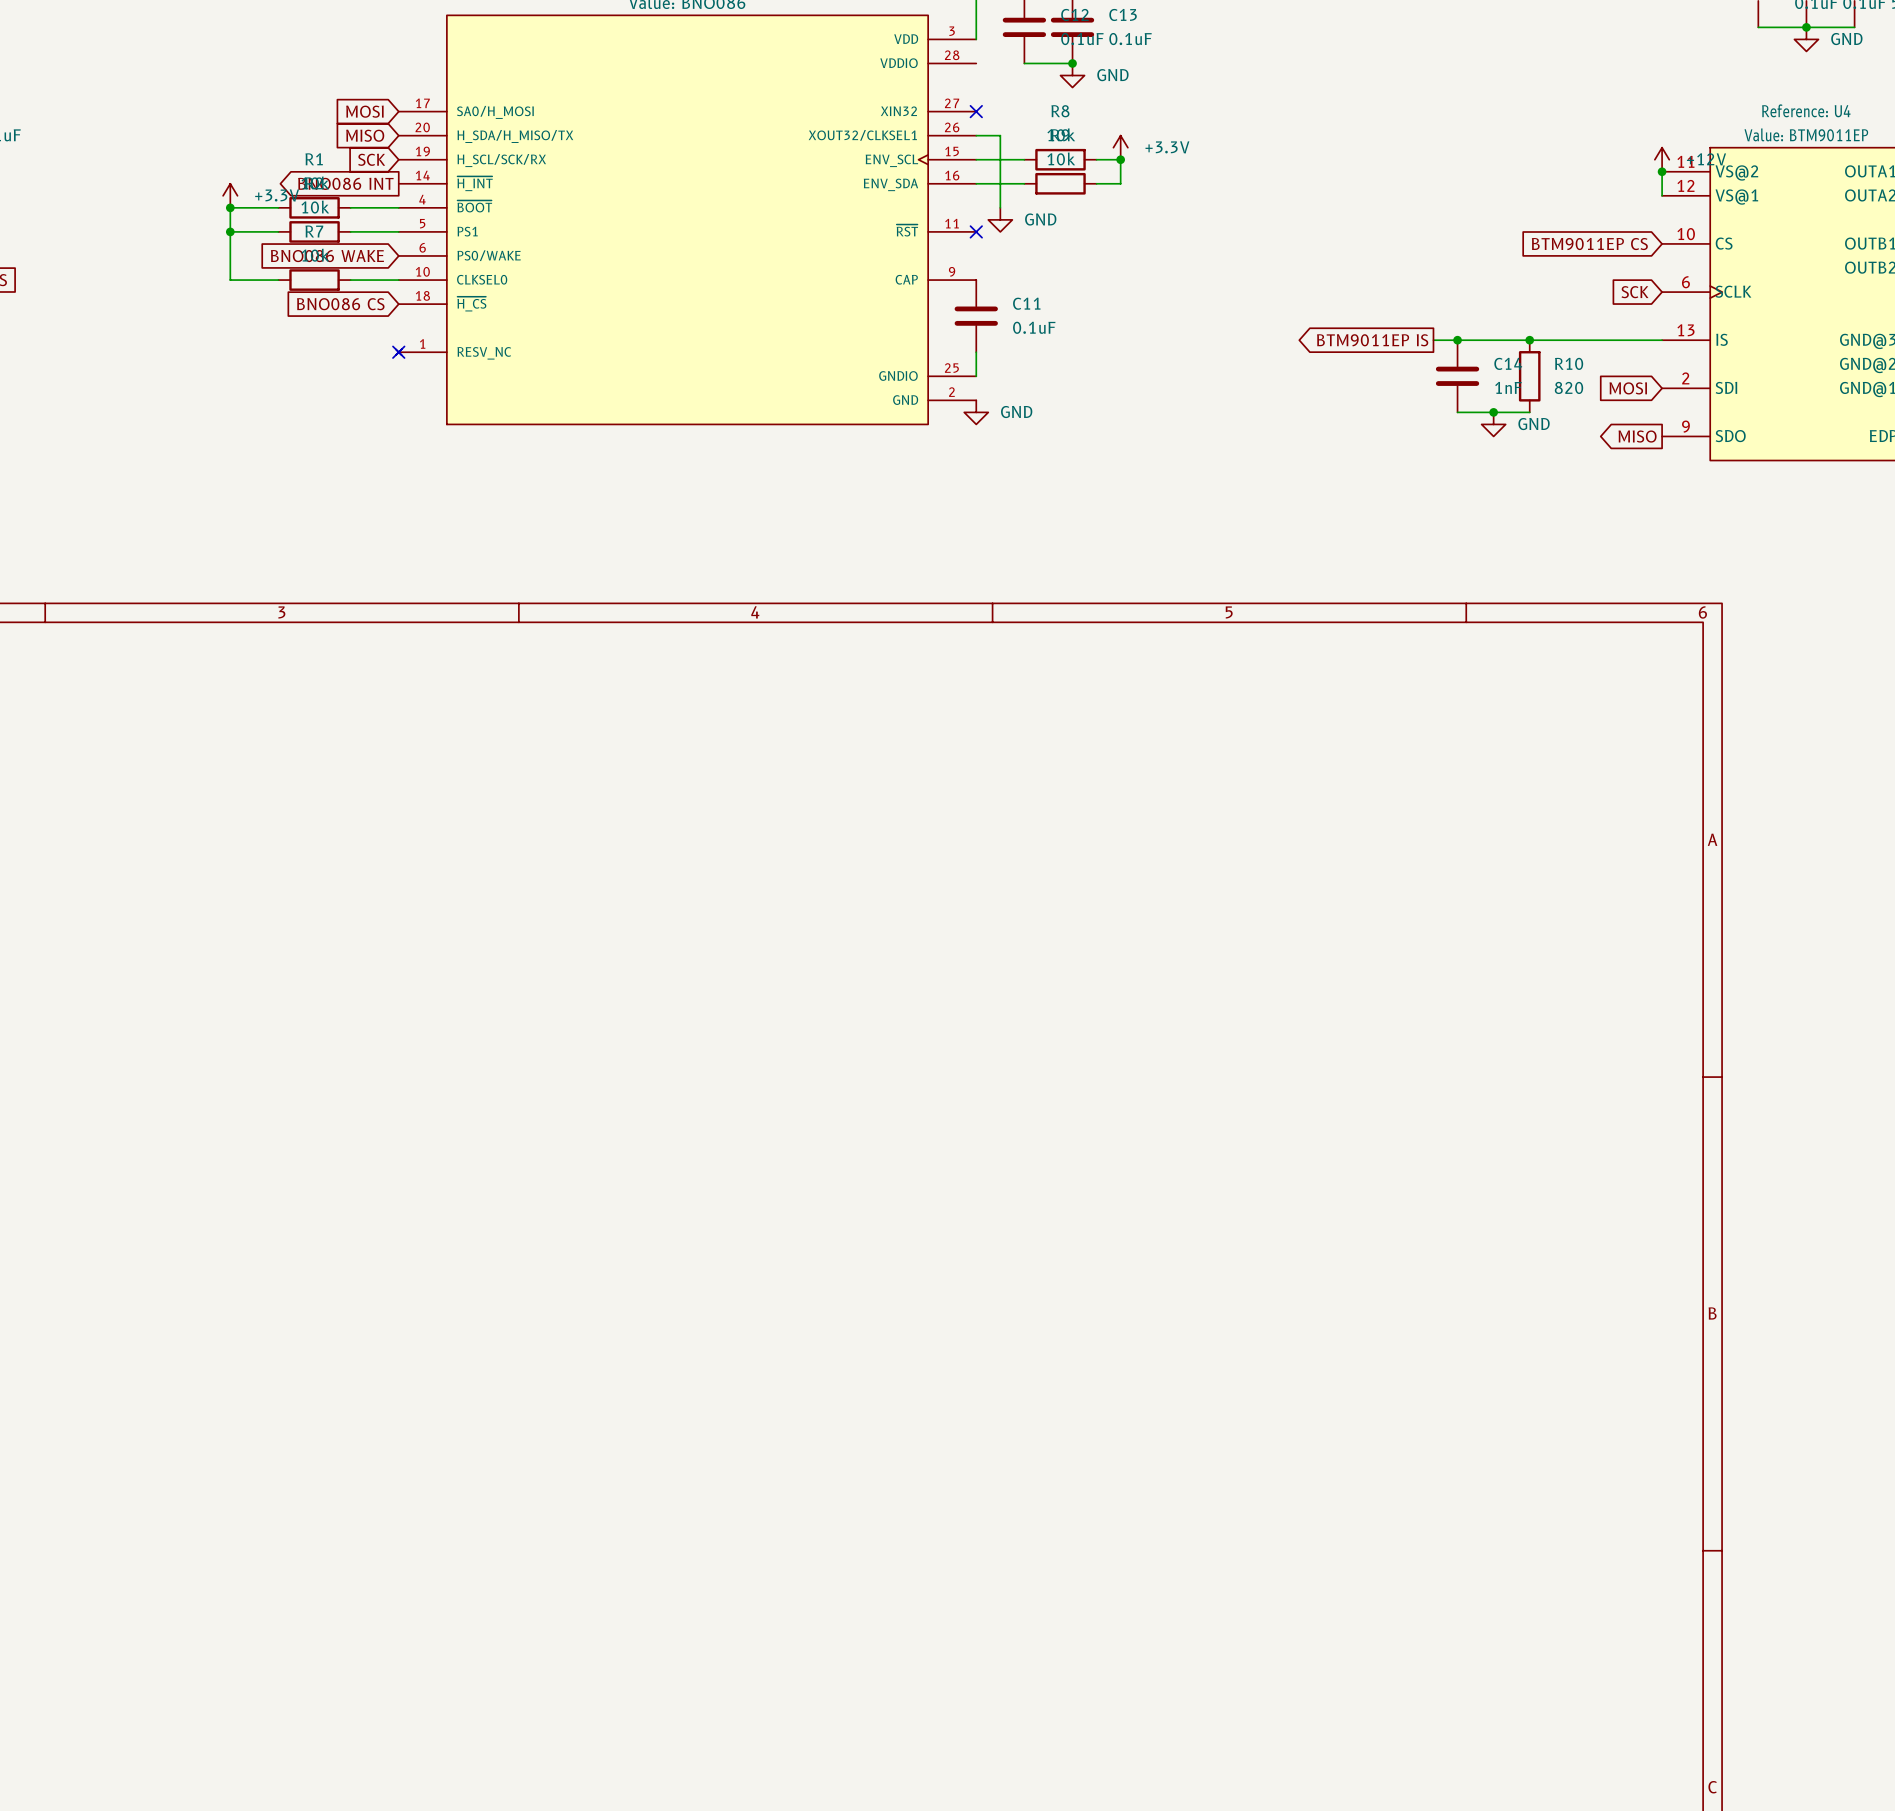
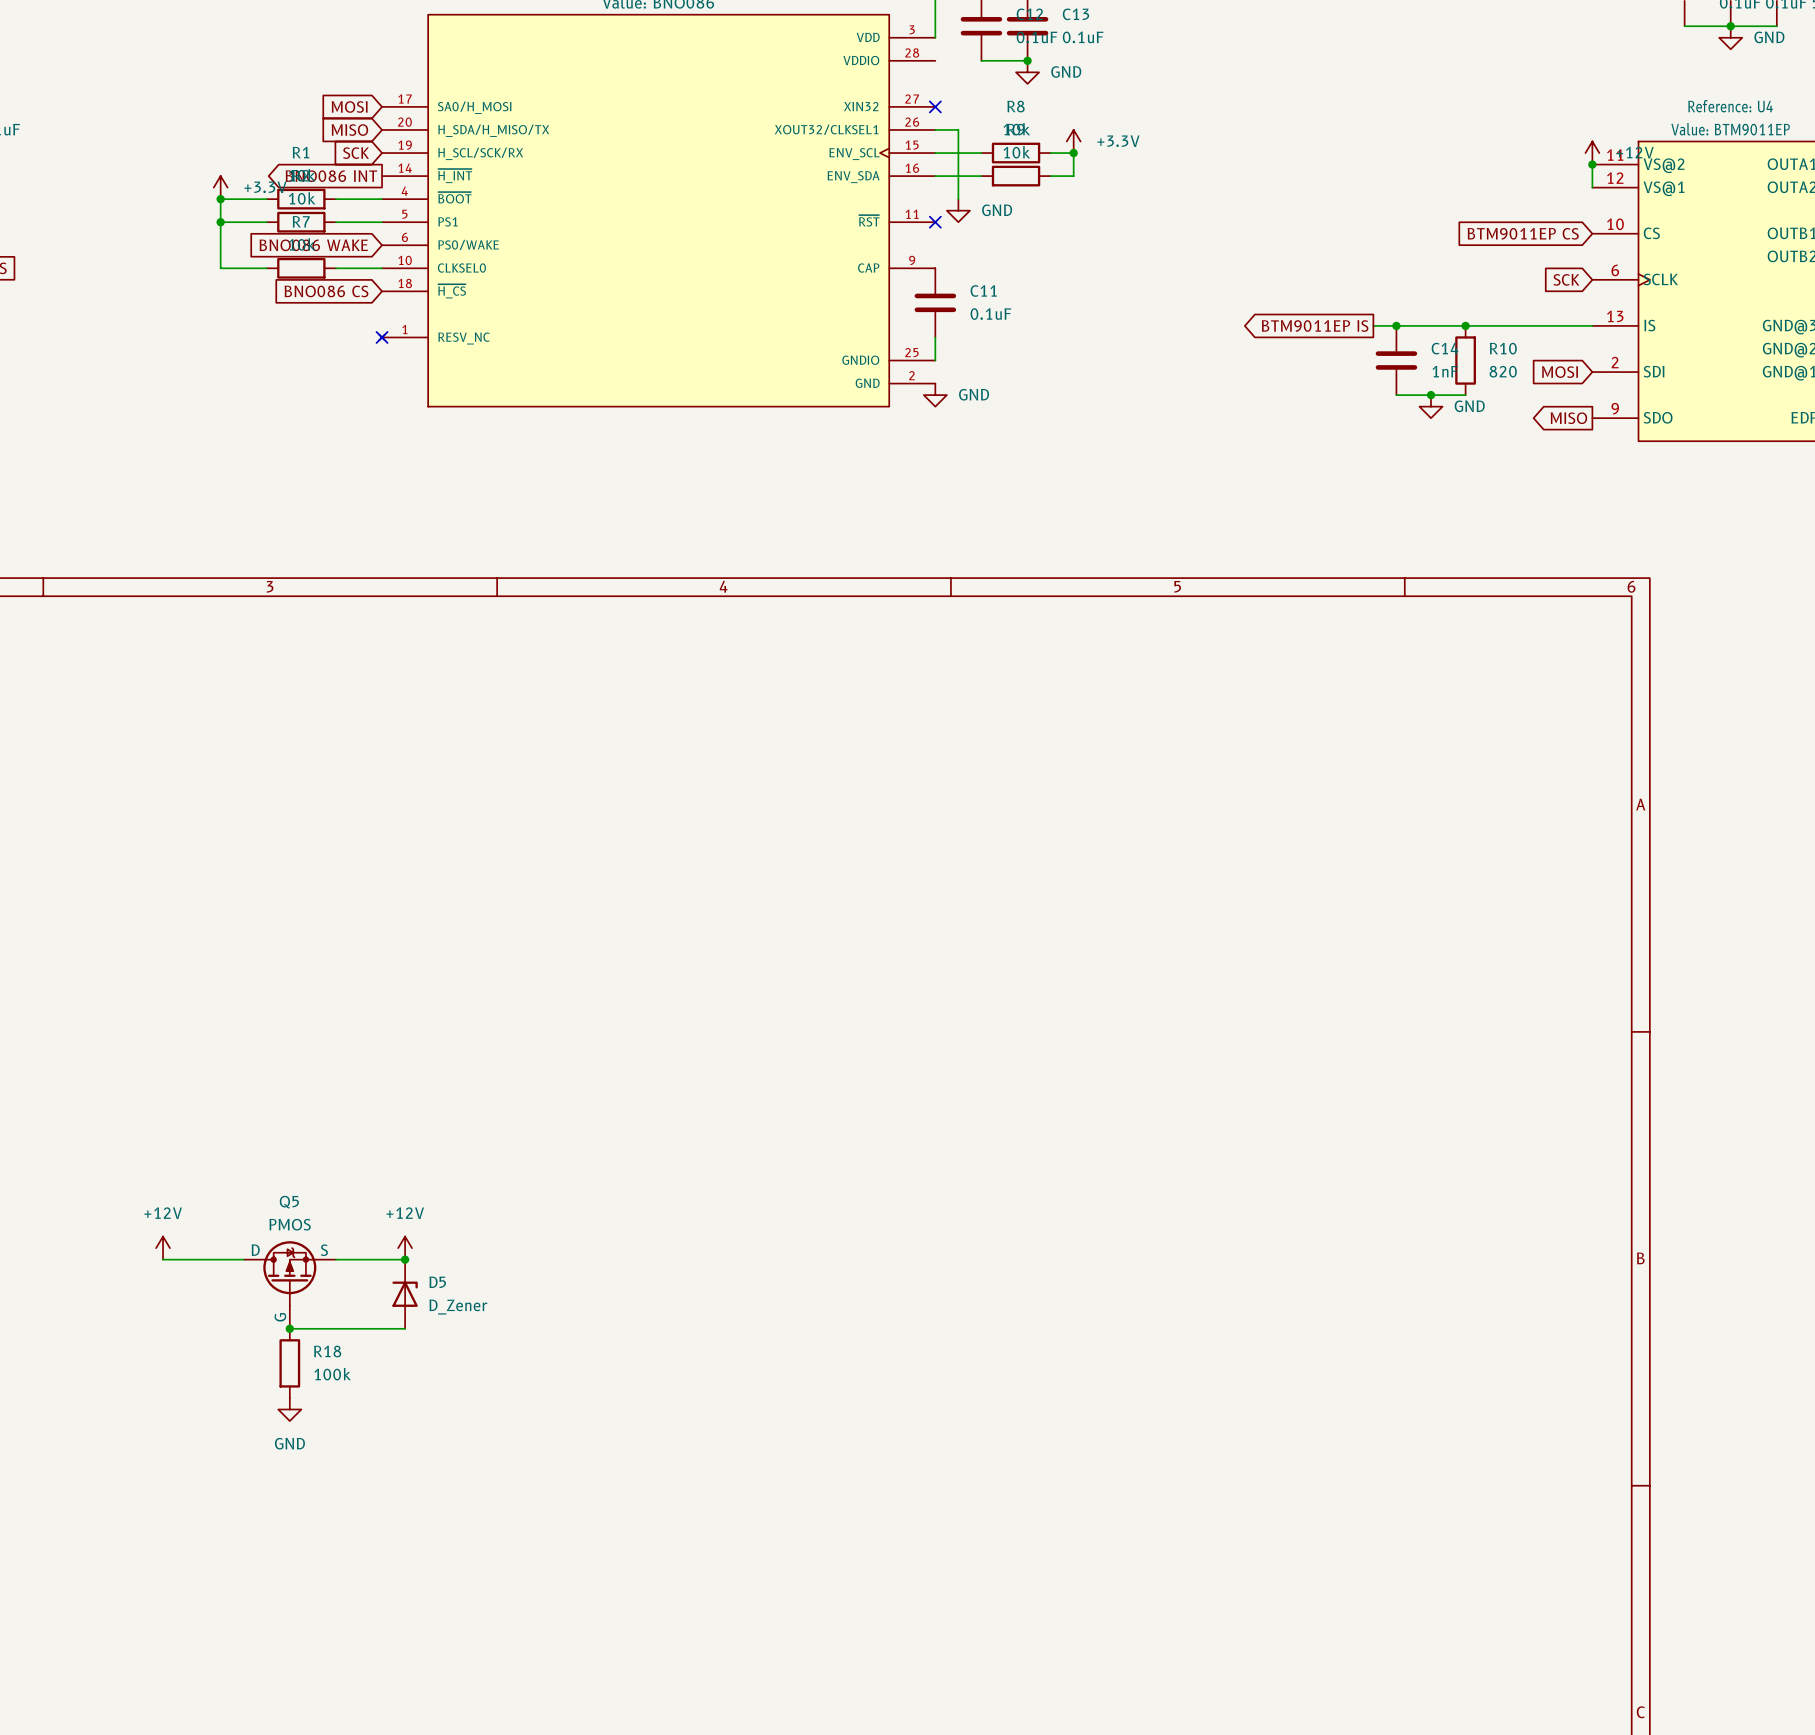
power symbol: none -> +12V (163, 1248)
power symbol: none -> +12V (405, 1248)
wire: none -> (163, 1259) (243, 1259)
wire: none -> (335, 1259) (405, 1259)
junction: none -> (405, 1259)
Q5: none -> PMOS (289, 1285)
D5: none -> D_Zener (405, 1294)
wire: none -> (289, 1328) (405, 1328)
junction: none -> (289, 1328)
R18: none -> 100k (289, 1363)
power symbol: none -> GND (289, 1409)

